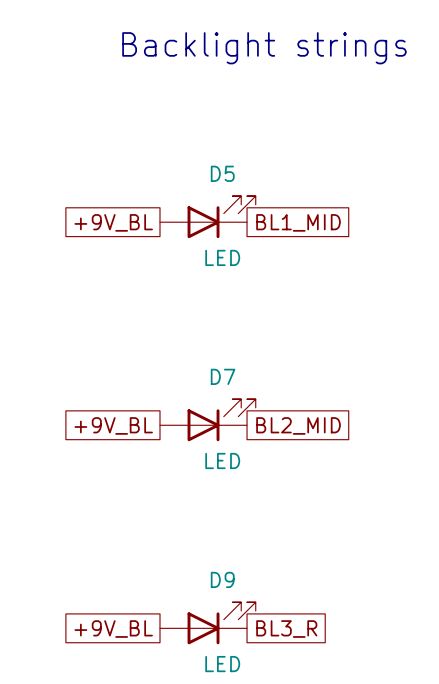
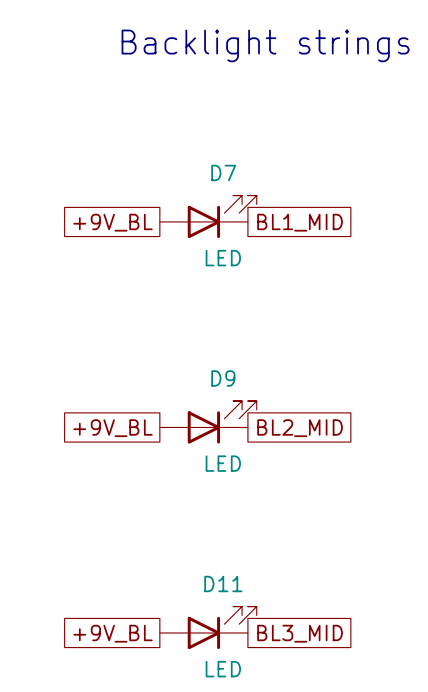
D5 name: D5 (222, 173) -> D7 (223, 172)
D7 name: D7 (223, 376) -> D9 (223, 378)
D9 name: D9 (222, 579) -> D11 (223, 584)
global label: BL3_R (286, 629) -> BL3_MID (300, 633)

